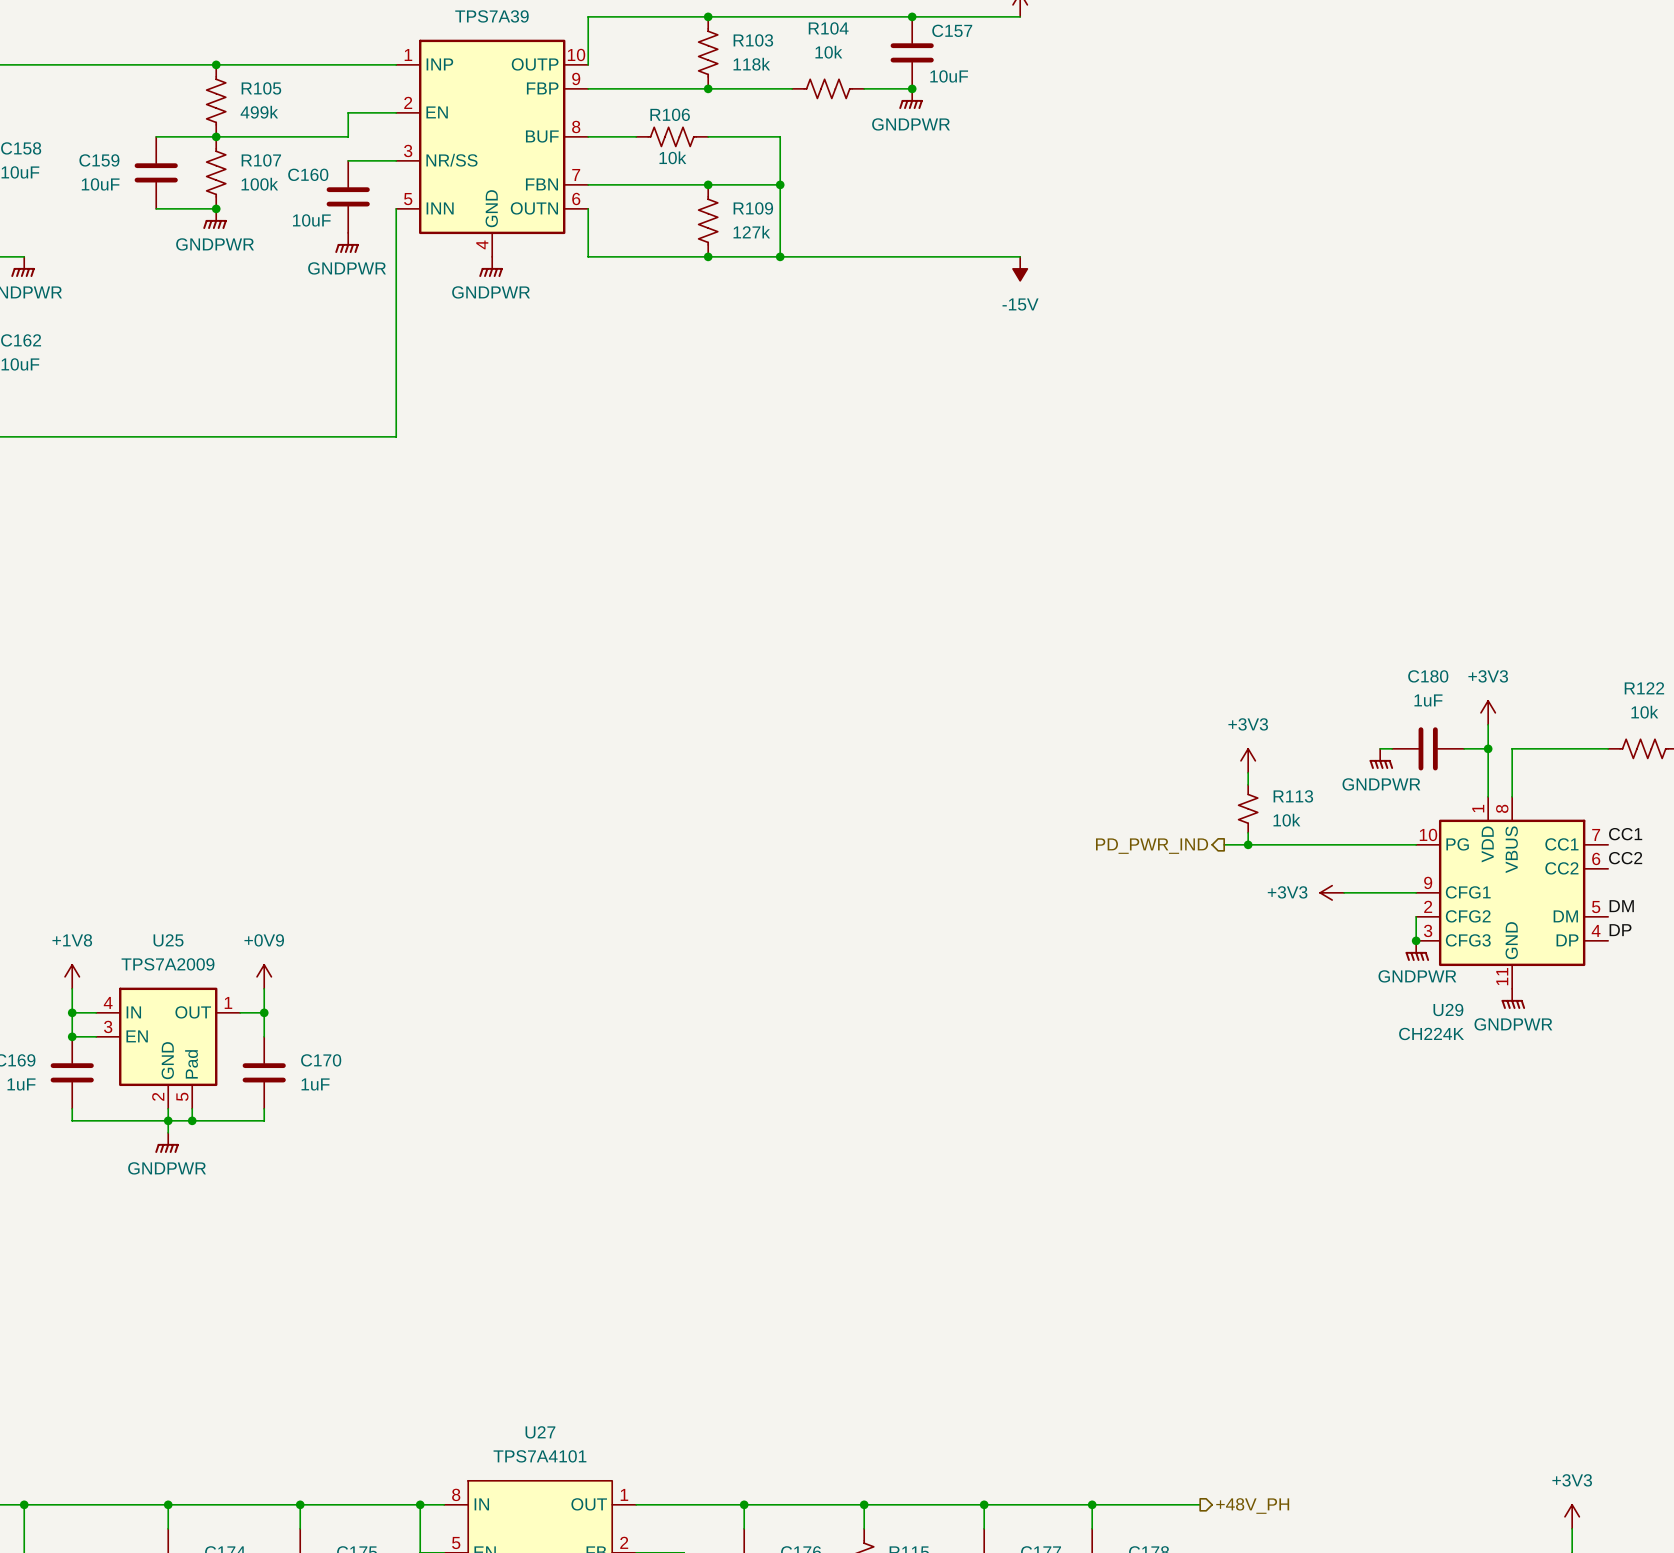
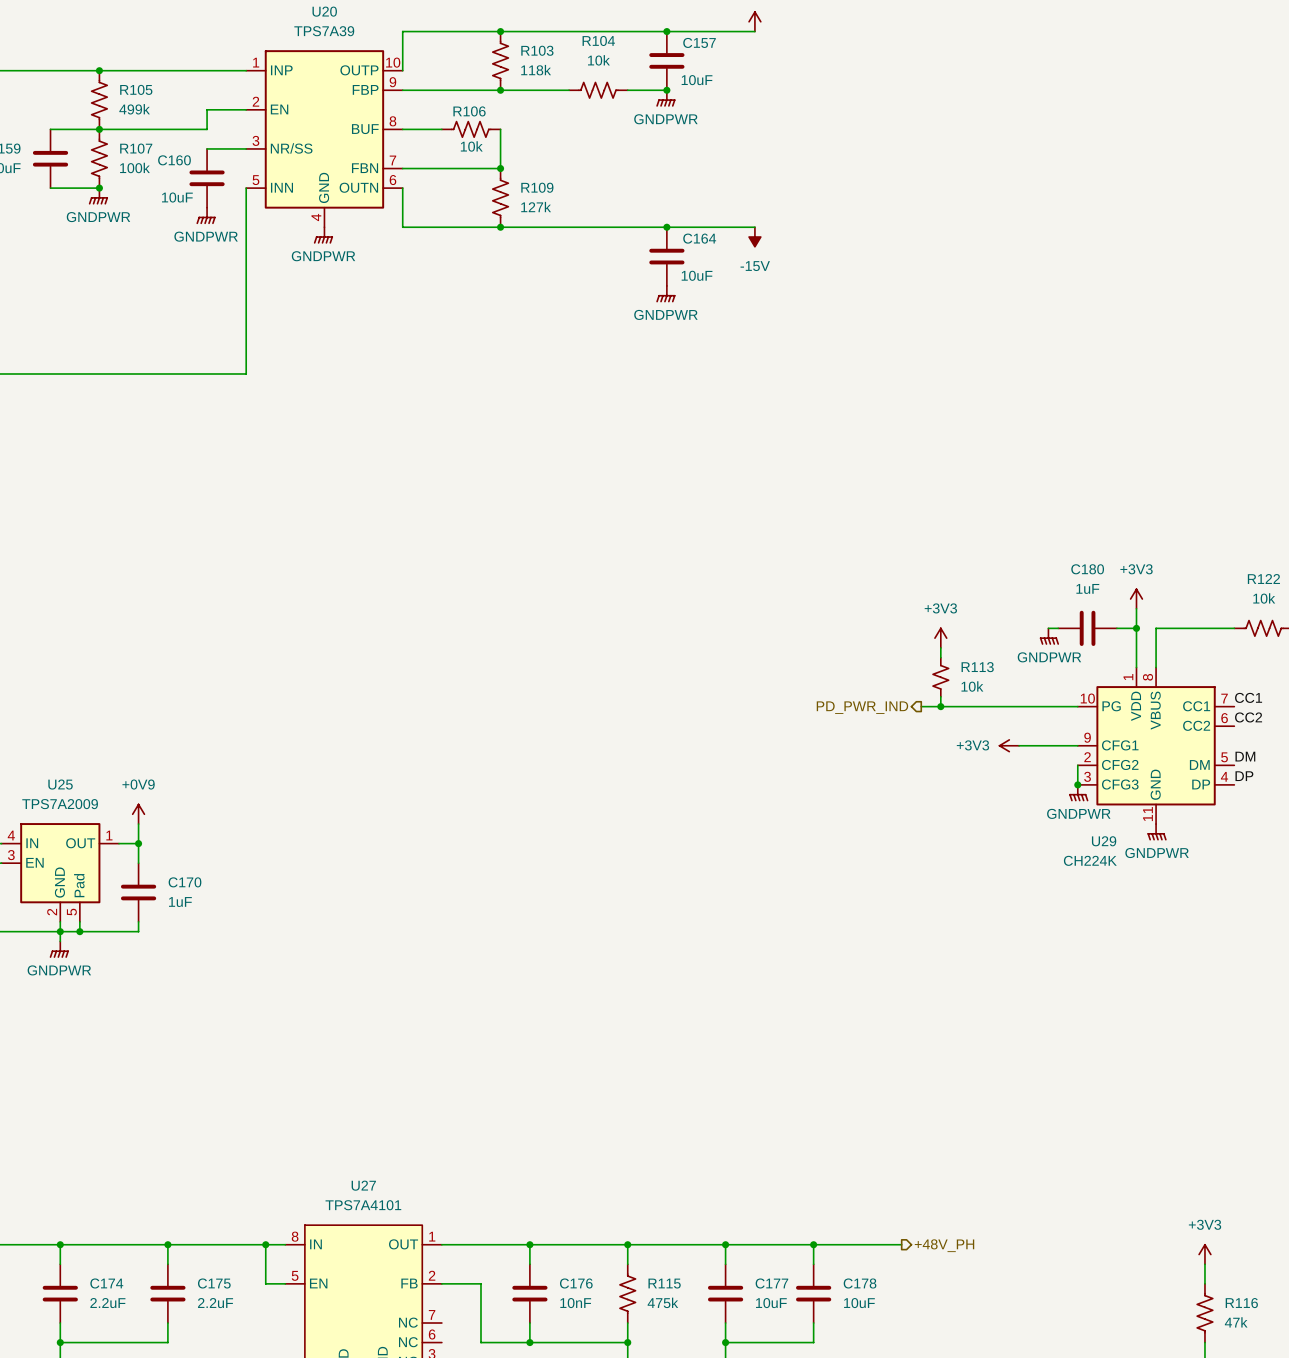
wire: (708, 136) (780, 136) (780, 256) -> none
wire: (708, 184) (780, 184) -> (500, 168) (500, 129)
junction: (780, 184) -> none
junction: (780, 256) -> none
junction: none -> (666, 227)
C164: none -> 10uF (666, 256)
power symbol: none -> GNDPWR (665, 294)

